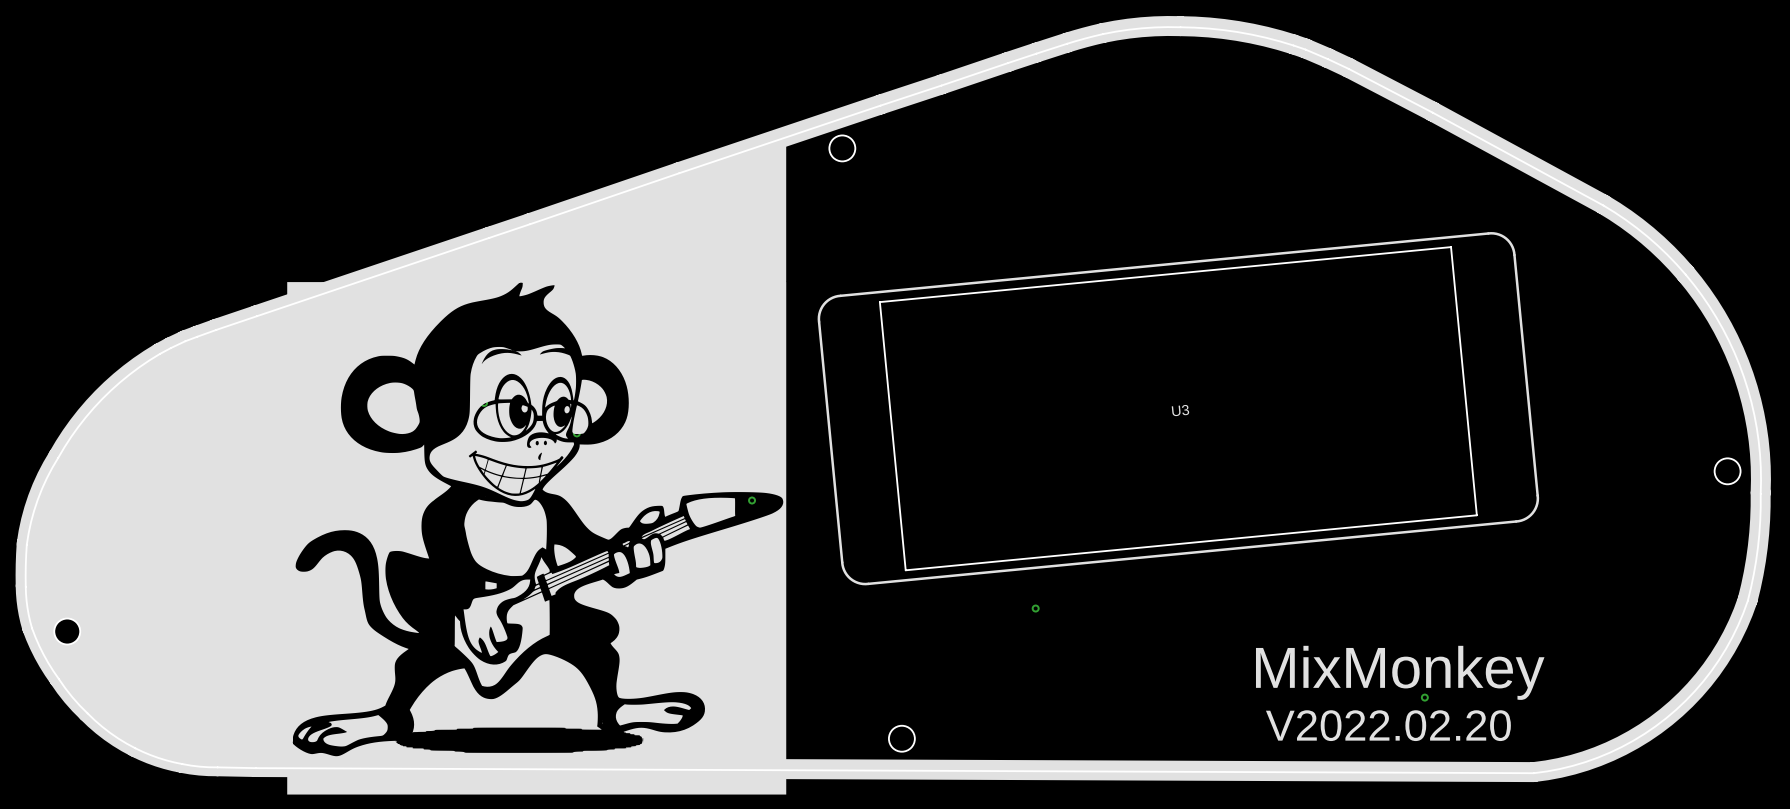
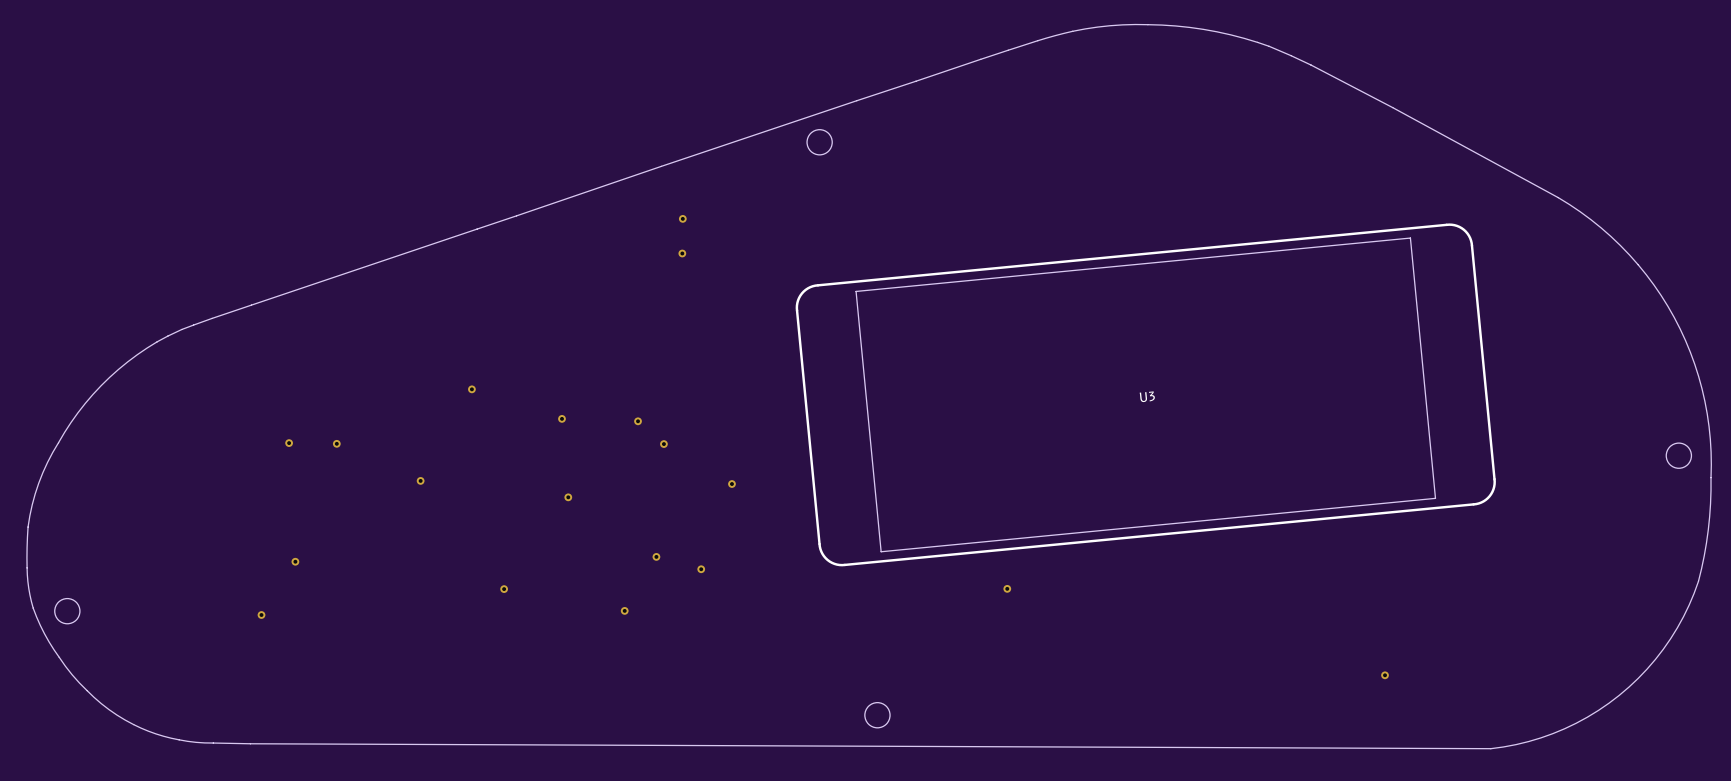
line: (1180, 26) (1128, 28) (1067, 42) (216, 328) (185, 340) (159, 352) (119, 381) (85, 416) (52, 466) (37, 498) (26, 543) (25, 592) (32, 627) (43, 653) (65, 687) (79, 704) (102, 725) (118, 737) (158, 756) (182, 762) (208, 766) (1533, 772) (1572, 764) (1597, 756) (1644, 732) (1685, 699) (1718, 658) (1743, 612) (1755, 560) (1760, 519) (1760, 479) (1756, 427) (1751, 401) (1739, 363) (1722, 327) (1709, 305) (1685, 273) (1667, 253) (1625, 218) (1603, 204) (1432, 111) (1348, 67) (1293, 44) (1237, 30) (1180, 26) -> none
drawing: [362, 137, 787, 283] -> none
drawing: [25, 304, 295, 769] -> none
part: (536, 538) -> none
text: MixMonkey (1400, 672) -> none
text: V2022.02.20 (1388, 725) -> none

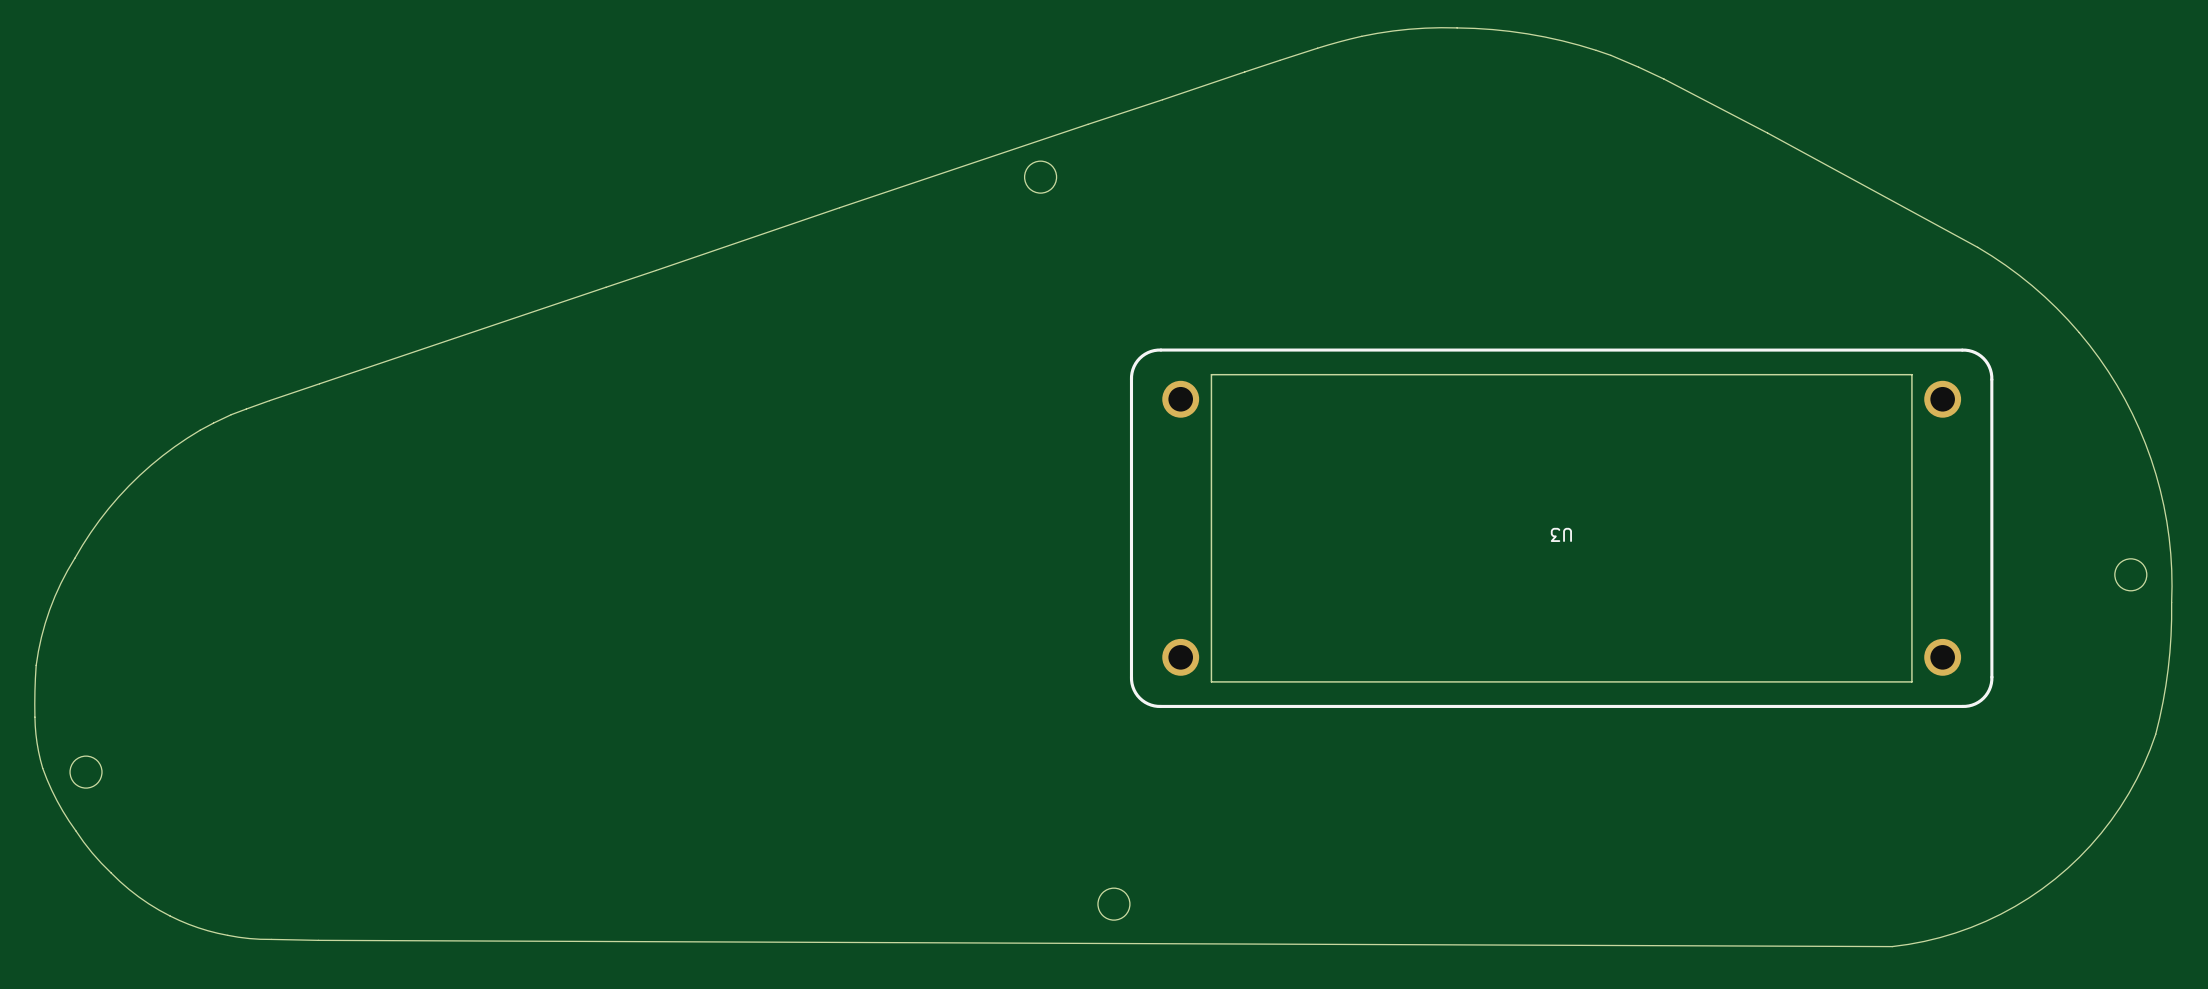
via: (682, 218) -> none
U3 footprint: [795, 223, 1496, 567] -> [1129, 348, 1994, 709]
via: (682, 253) -> none
via: (471, 389) -> none
via: (561, 418) -> none
via: (638, 421) -> none
via: (289, 443) -> none
via: (336, 443) -> none
via: (663, 444) -> none
via: (420, 480) -> none
via: (731, 484) -> none
via: (568, 497) -> none
via: (656, 556) -> none
via: (295, 561) -> none
via: (701, 569) -> none
via: (1007, 588) -> none
via: (504, 589) -> none
via: (624, 610) -> none
via: (261, 615) -> none
via: (1385, 675) -> none

